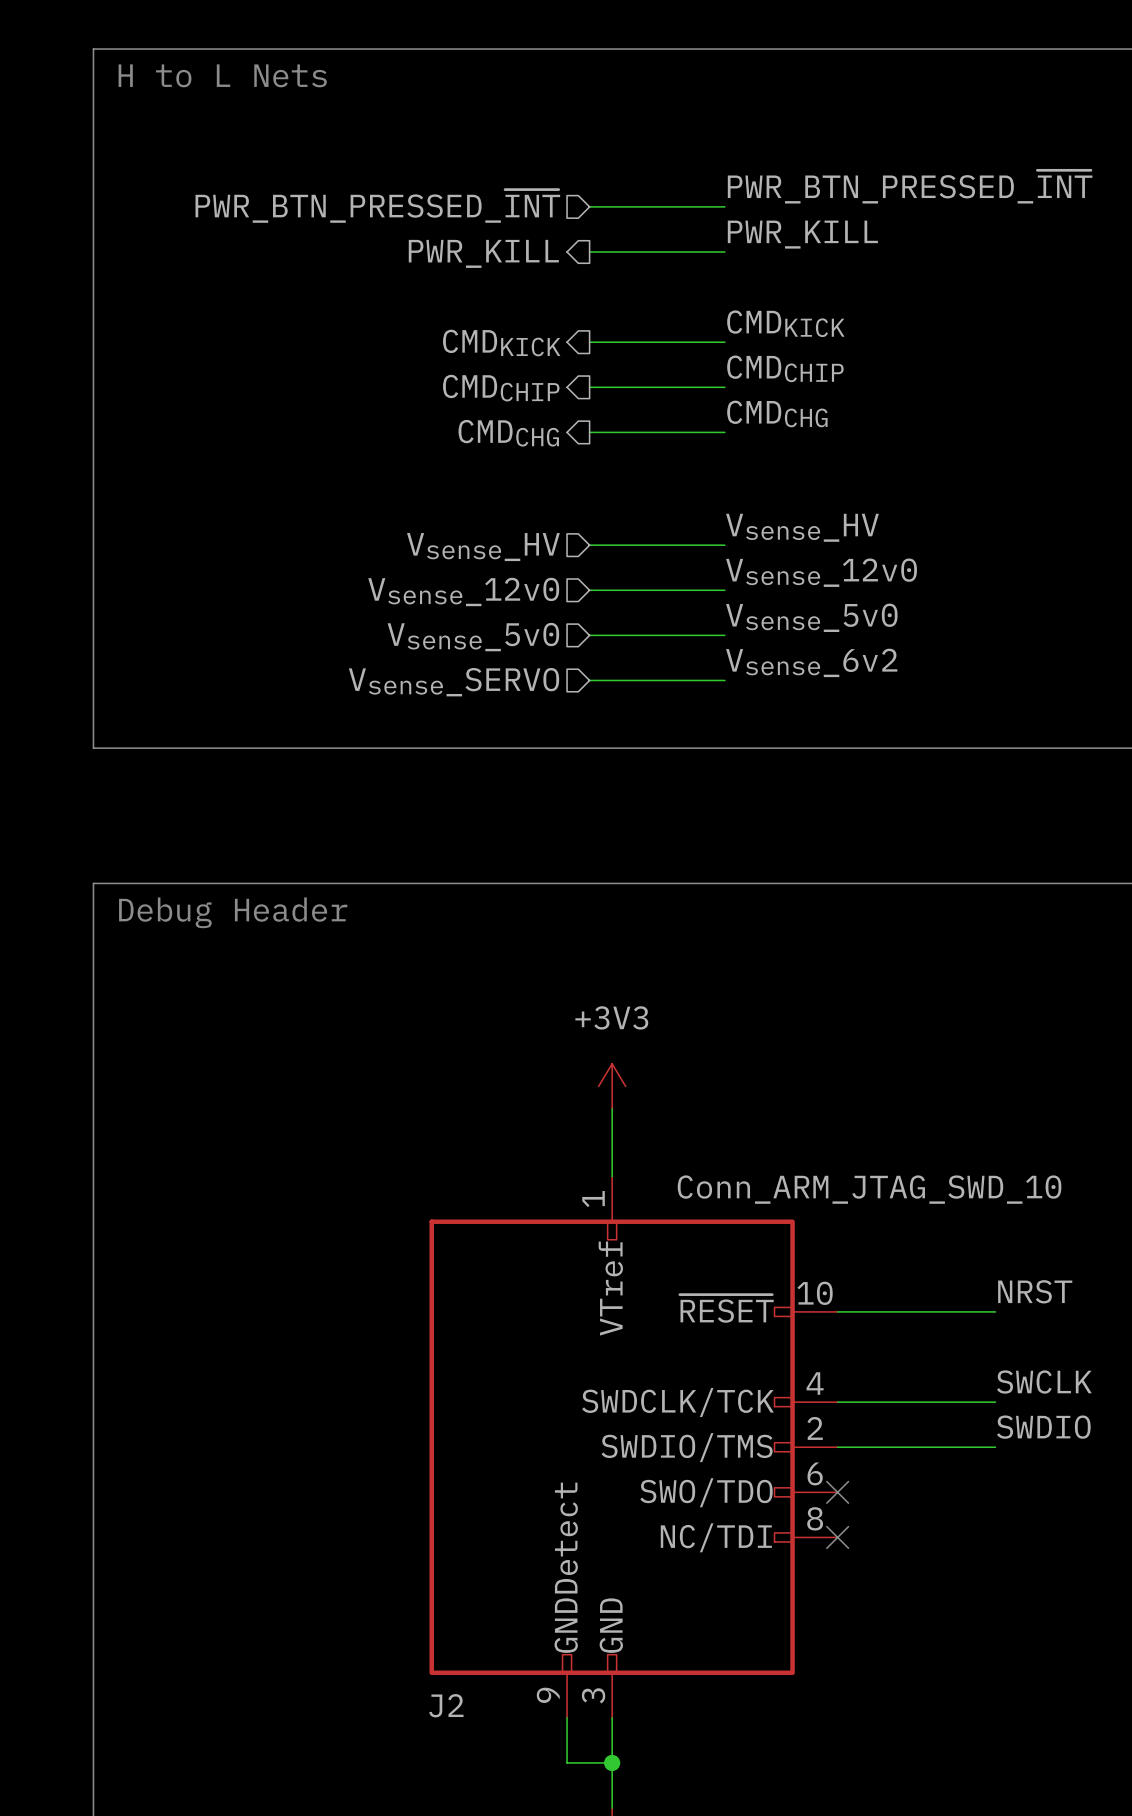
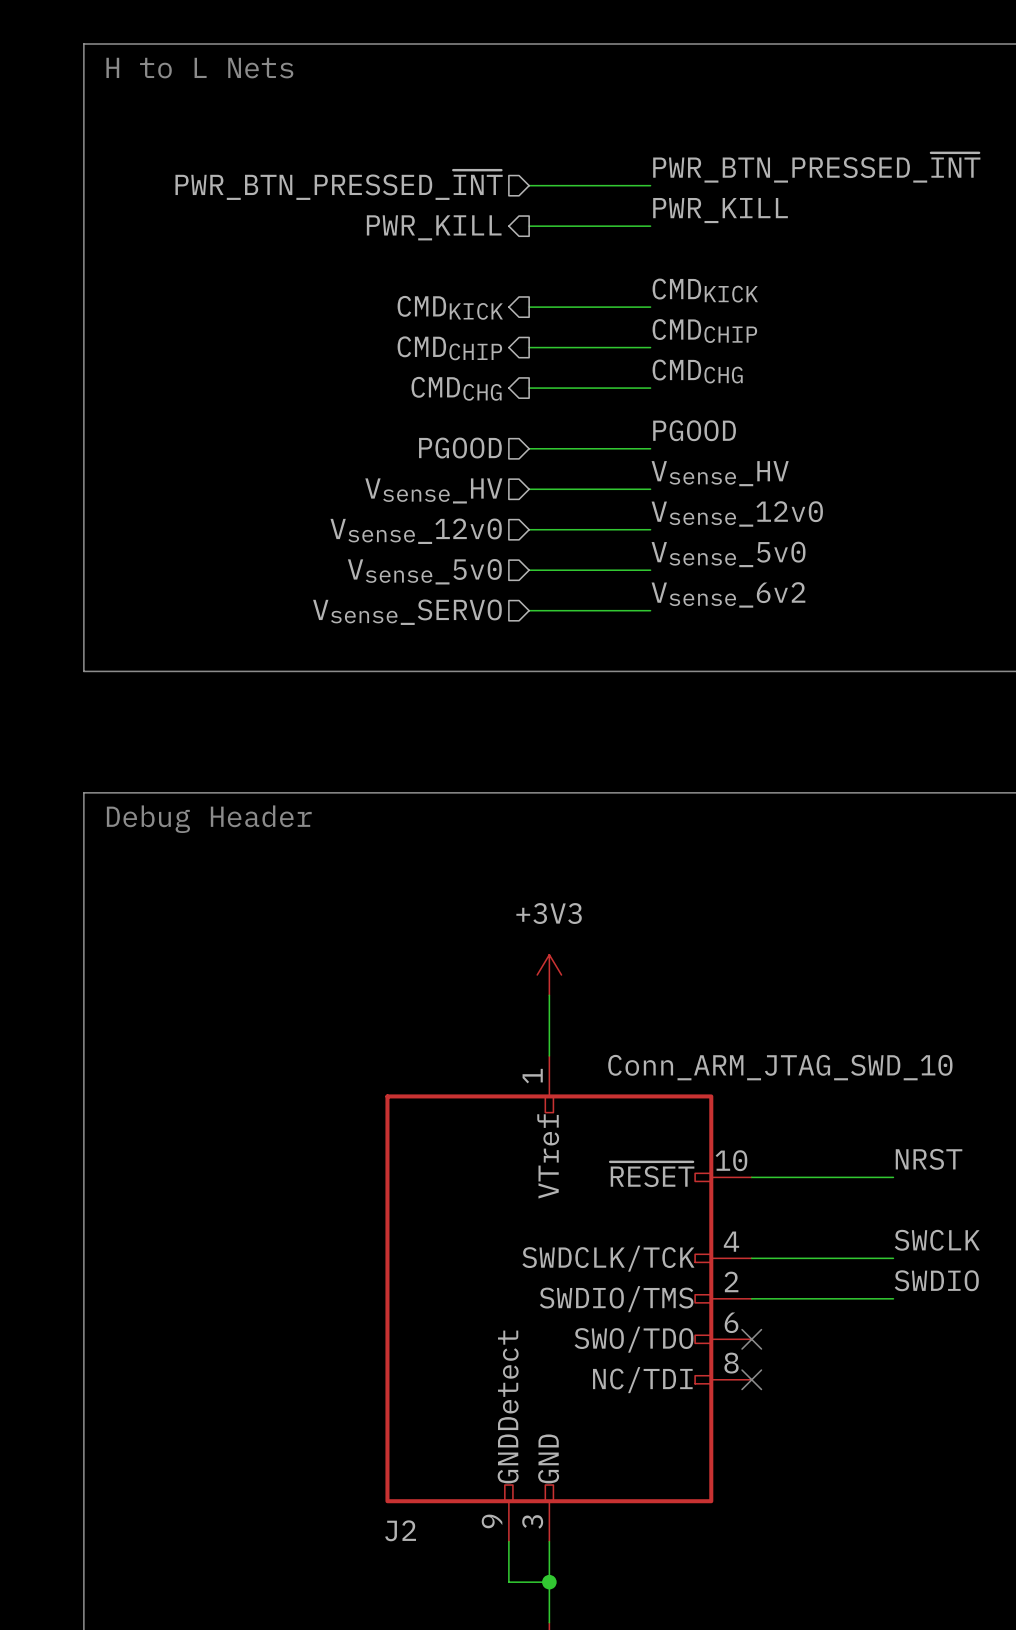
label: none -> PGOOD (694, 430)
hierarchical label: none -> PGOOD (460, 448)
wire: none -> (529, 448) (650, 448)

